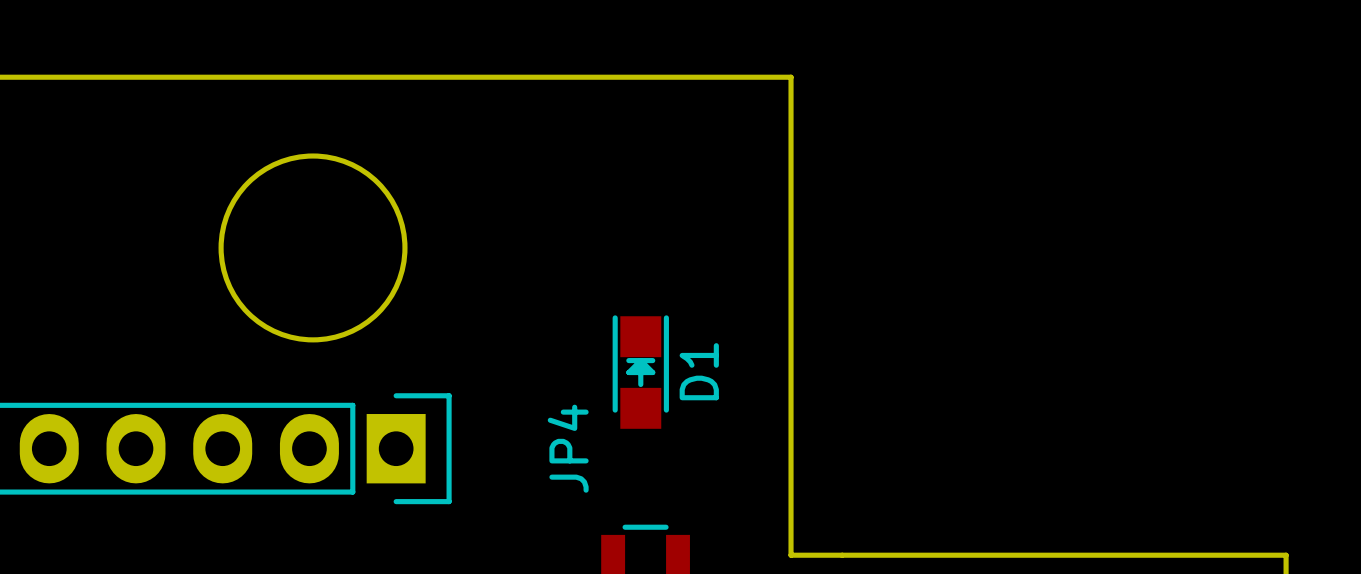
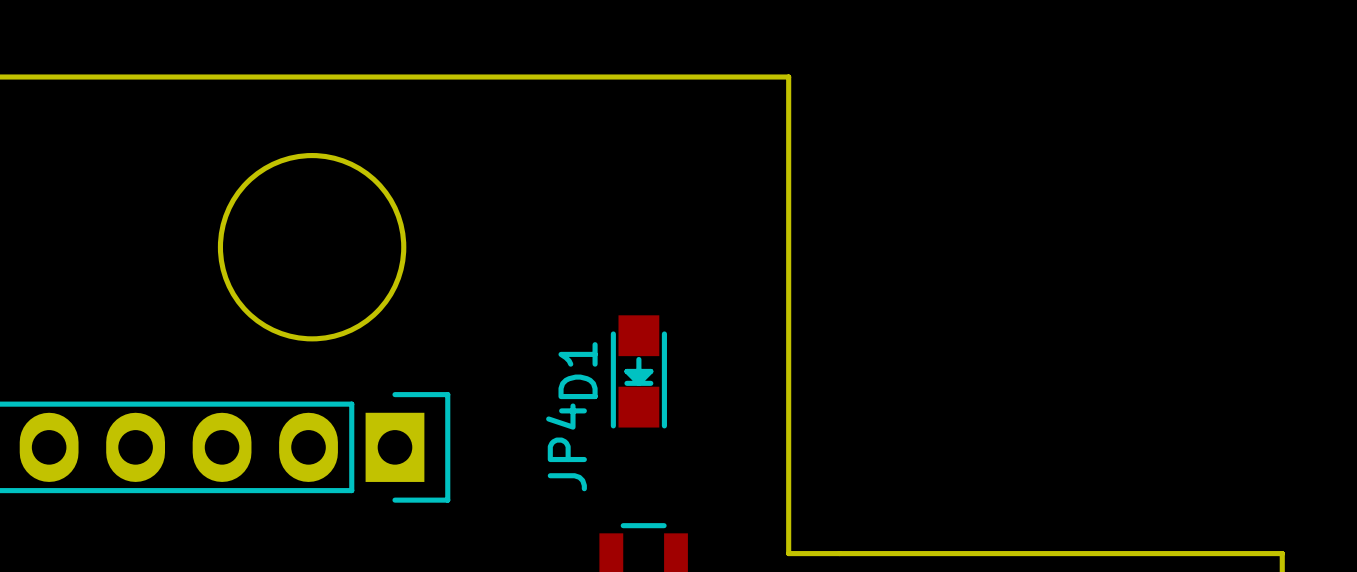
D1 rotation: 0° (640, 372) -> 180° (638, 371)

